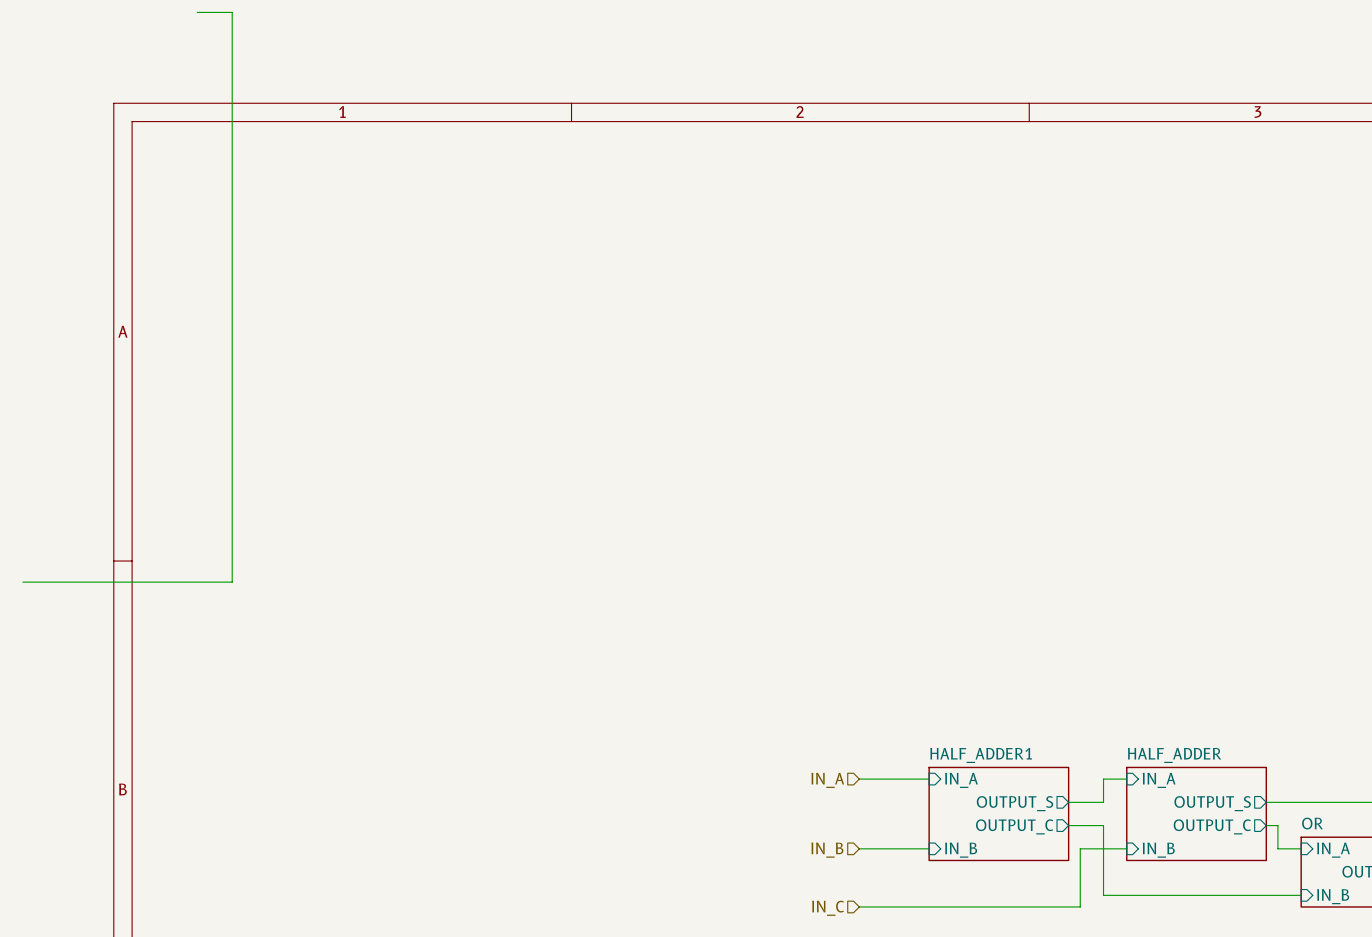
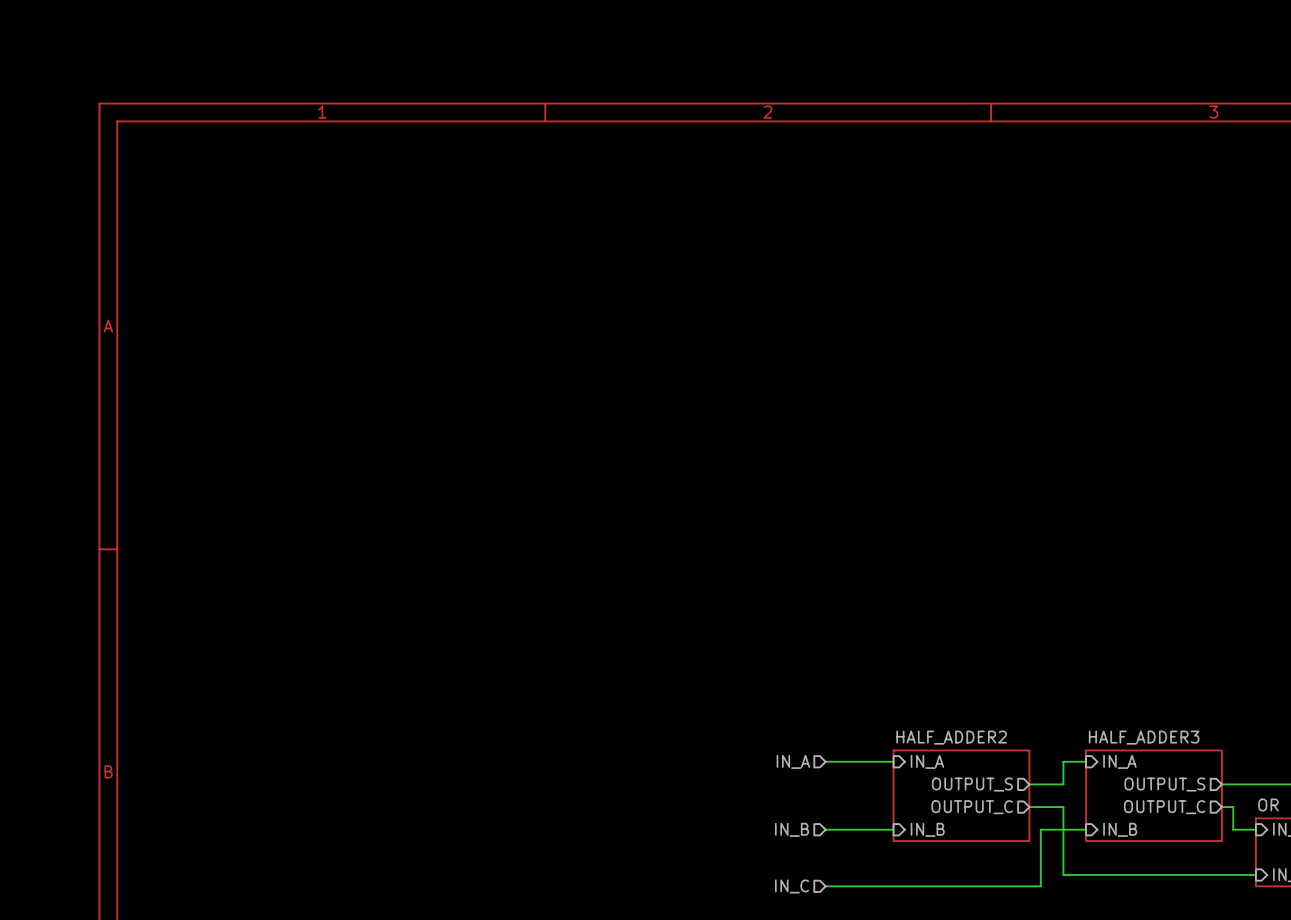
wire: (197, 12) (232, 12) (232, 582) (22, 582) -> none
sheet HALF_ADDER1 name: HALF_ADDER1 (981, 755) -> HALF_ADDER2 (951, 737)
sheet HALF_ADDER name: HALF_ADDER (1174, 755) -> HALF_ADDER3 (1144, 737)

